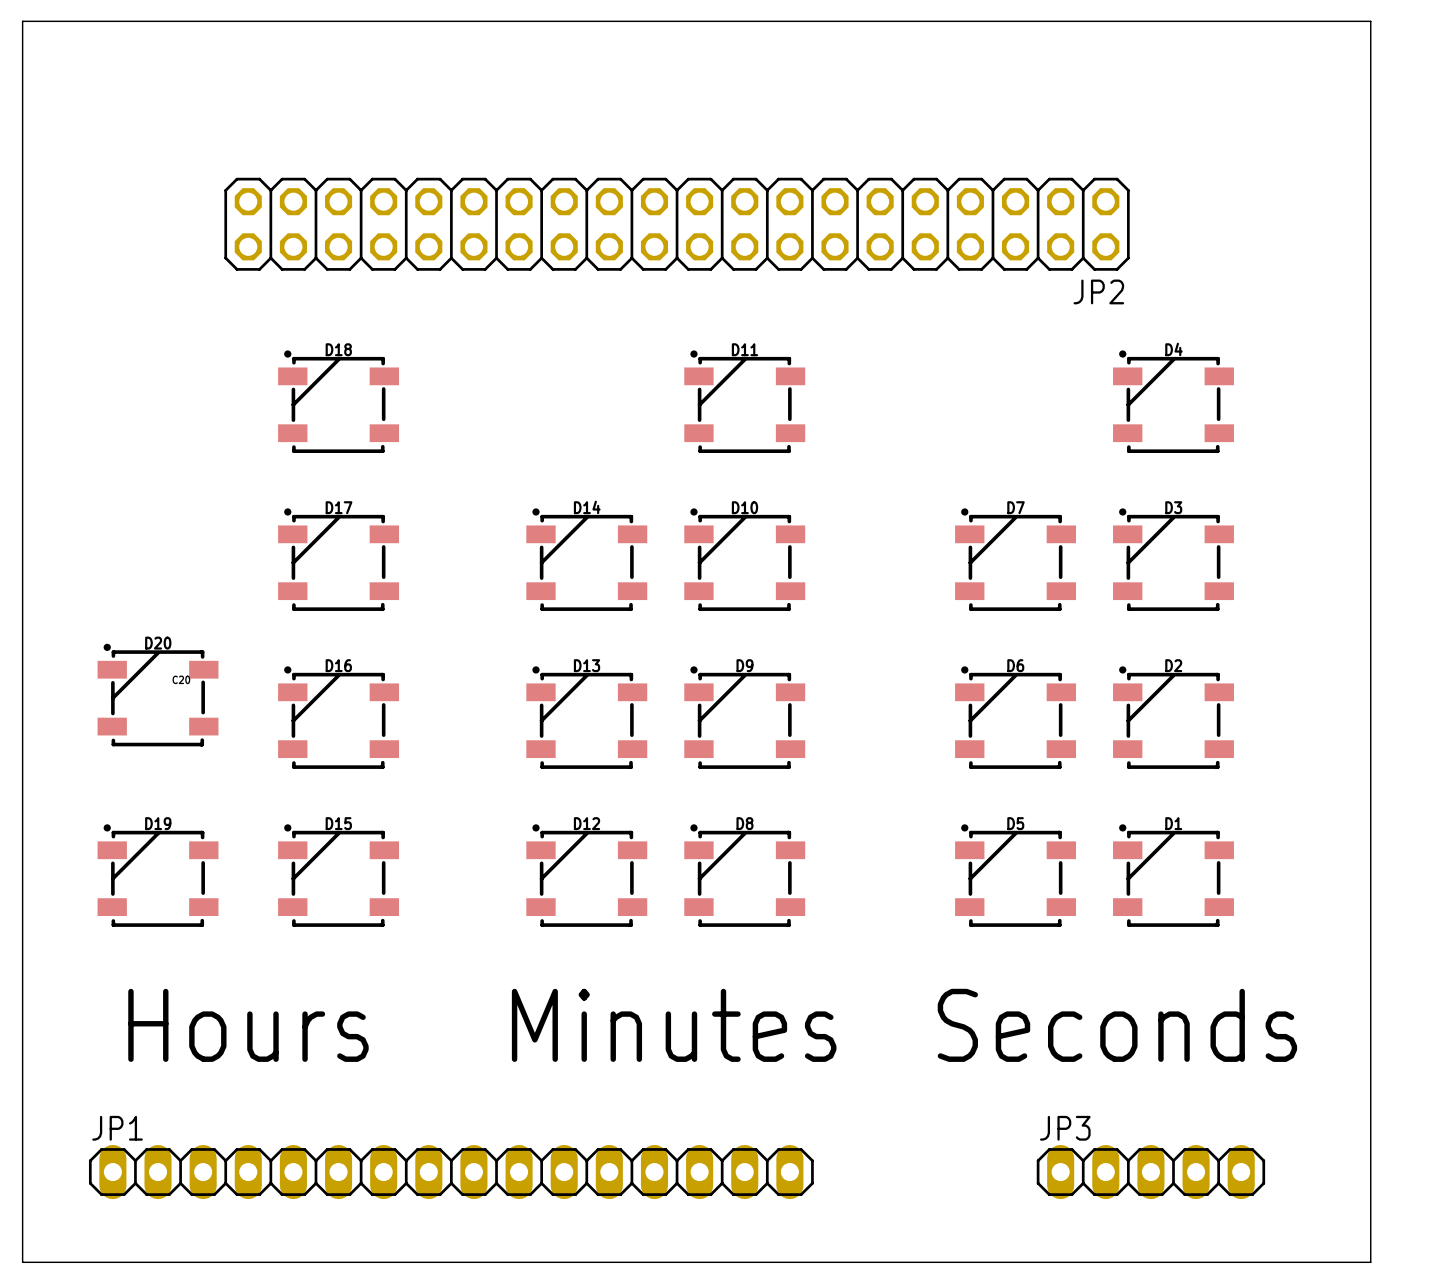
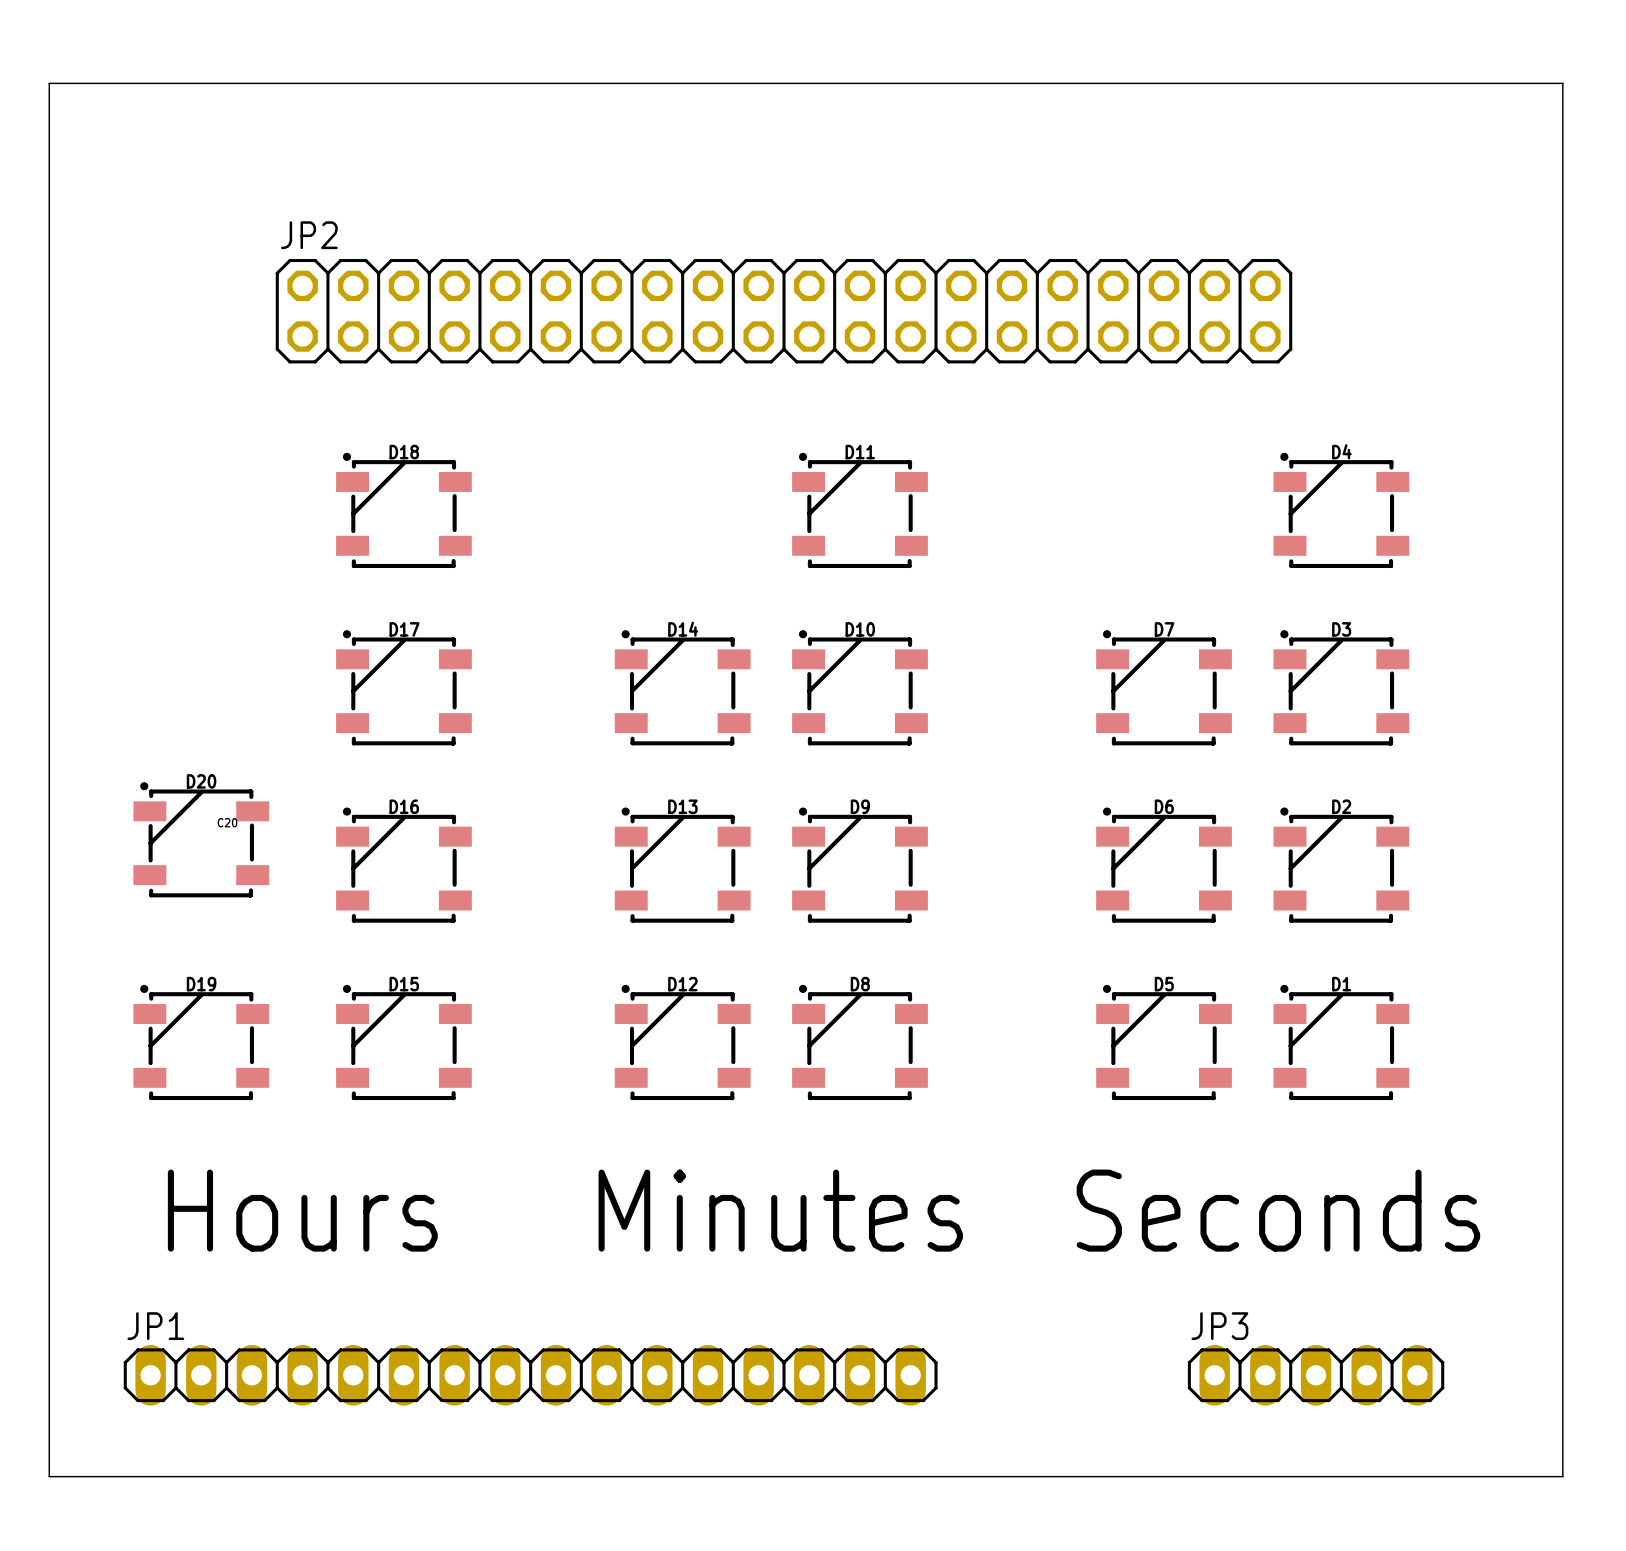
JP2 name position: JP2 (1098, 291) -> JP2 (309, 235)

